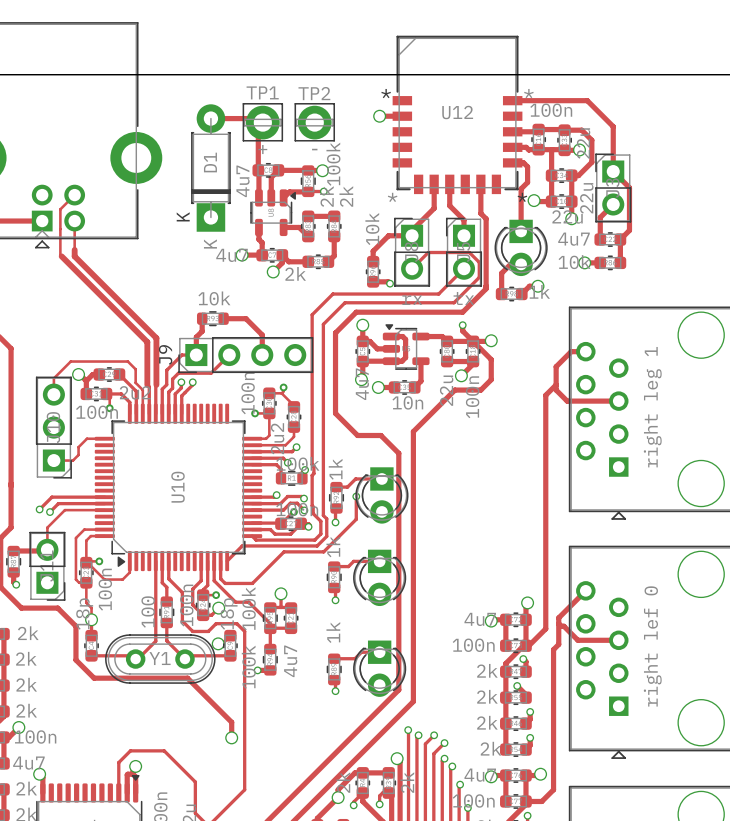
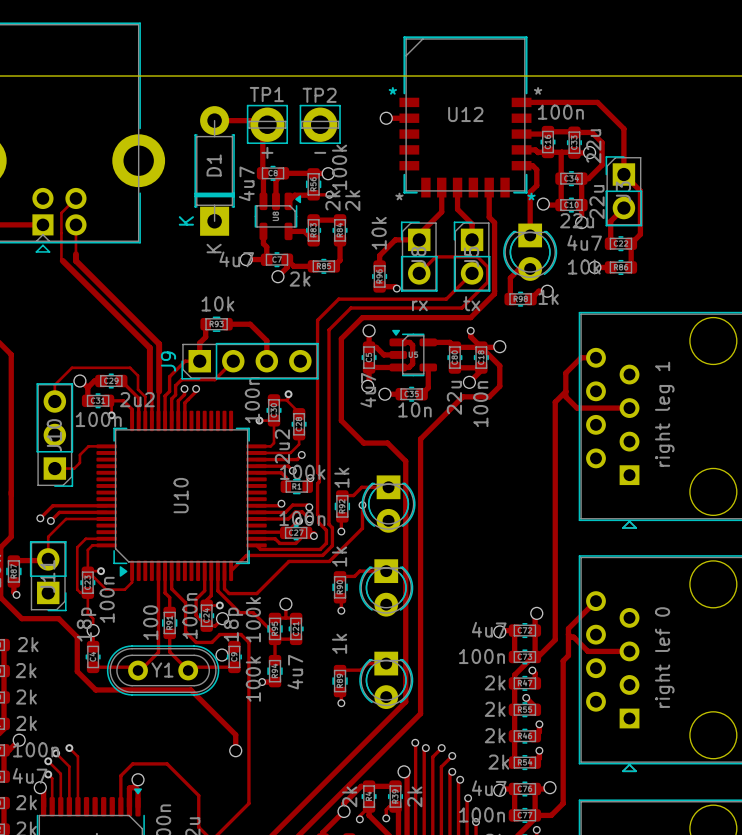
track: none -> (69, 748) (77, 756) (77, 806)
via: none -> (69, 748)
track: none -> (56, 753) (69, 766) (69, 806)
via: none -> (56, 753)
track: none -> (48, 761) (60, 773) (60, 806)
via: none -> (48, 761)
track: none -> (48, 774) (52, 778) (52, 806)
via: none -> (48, 774)

